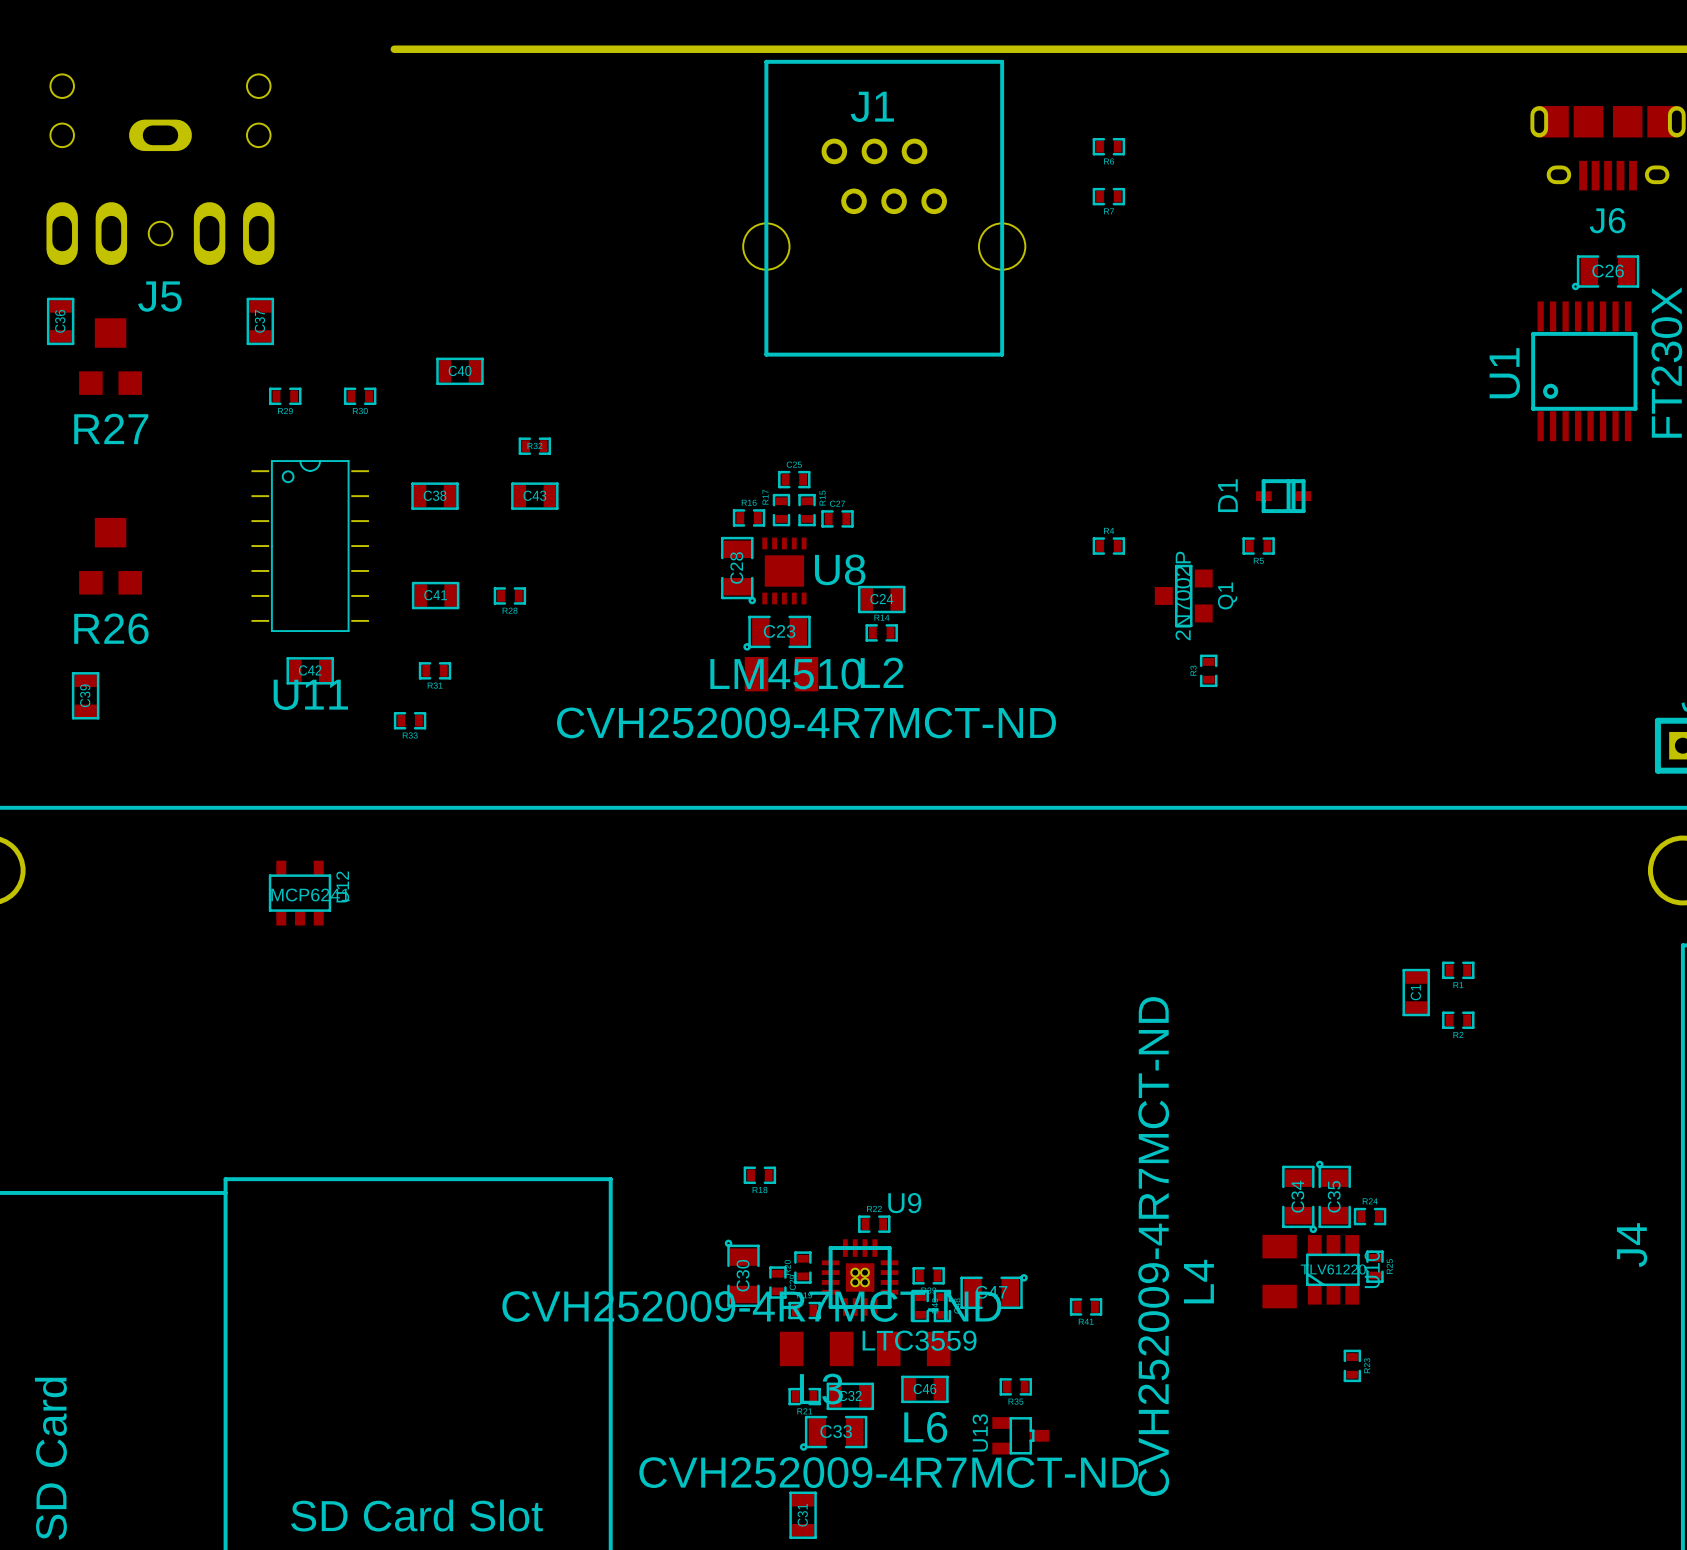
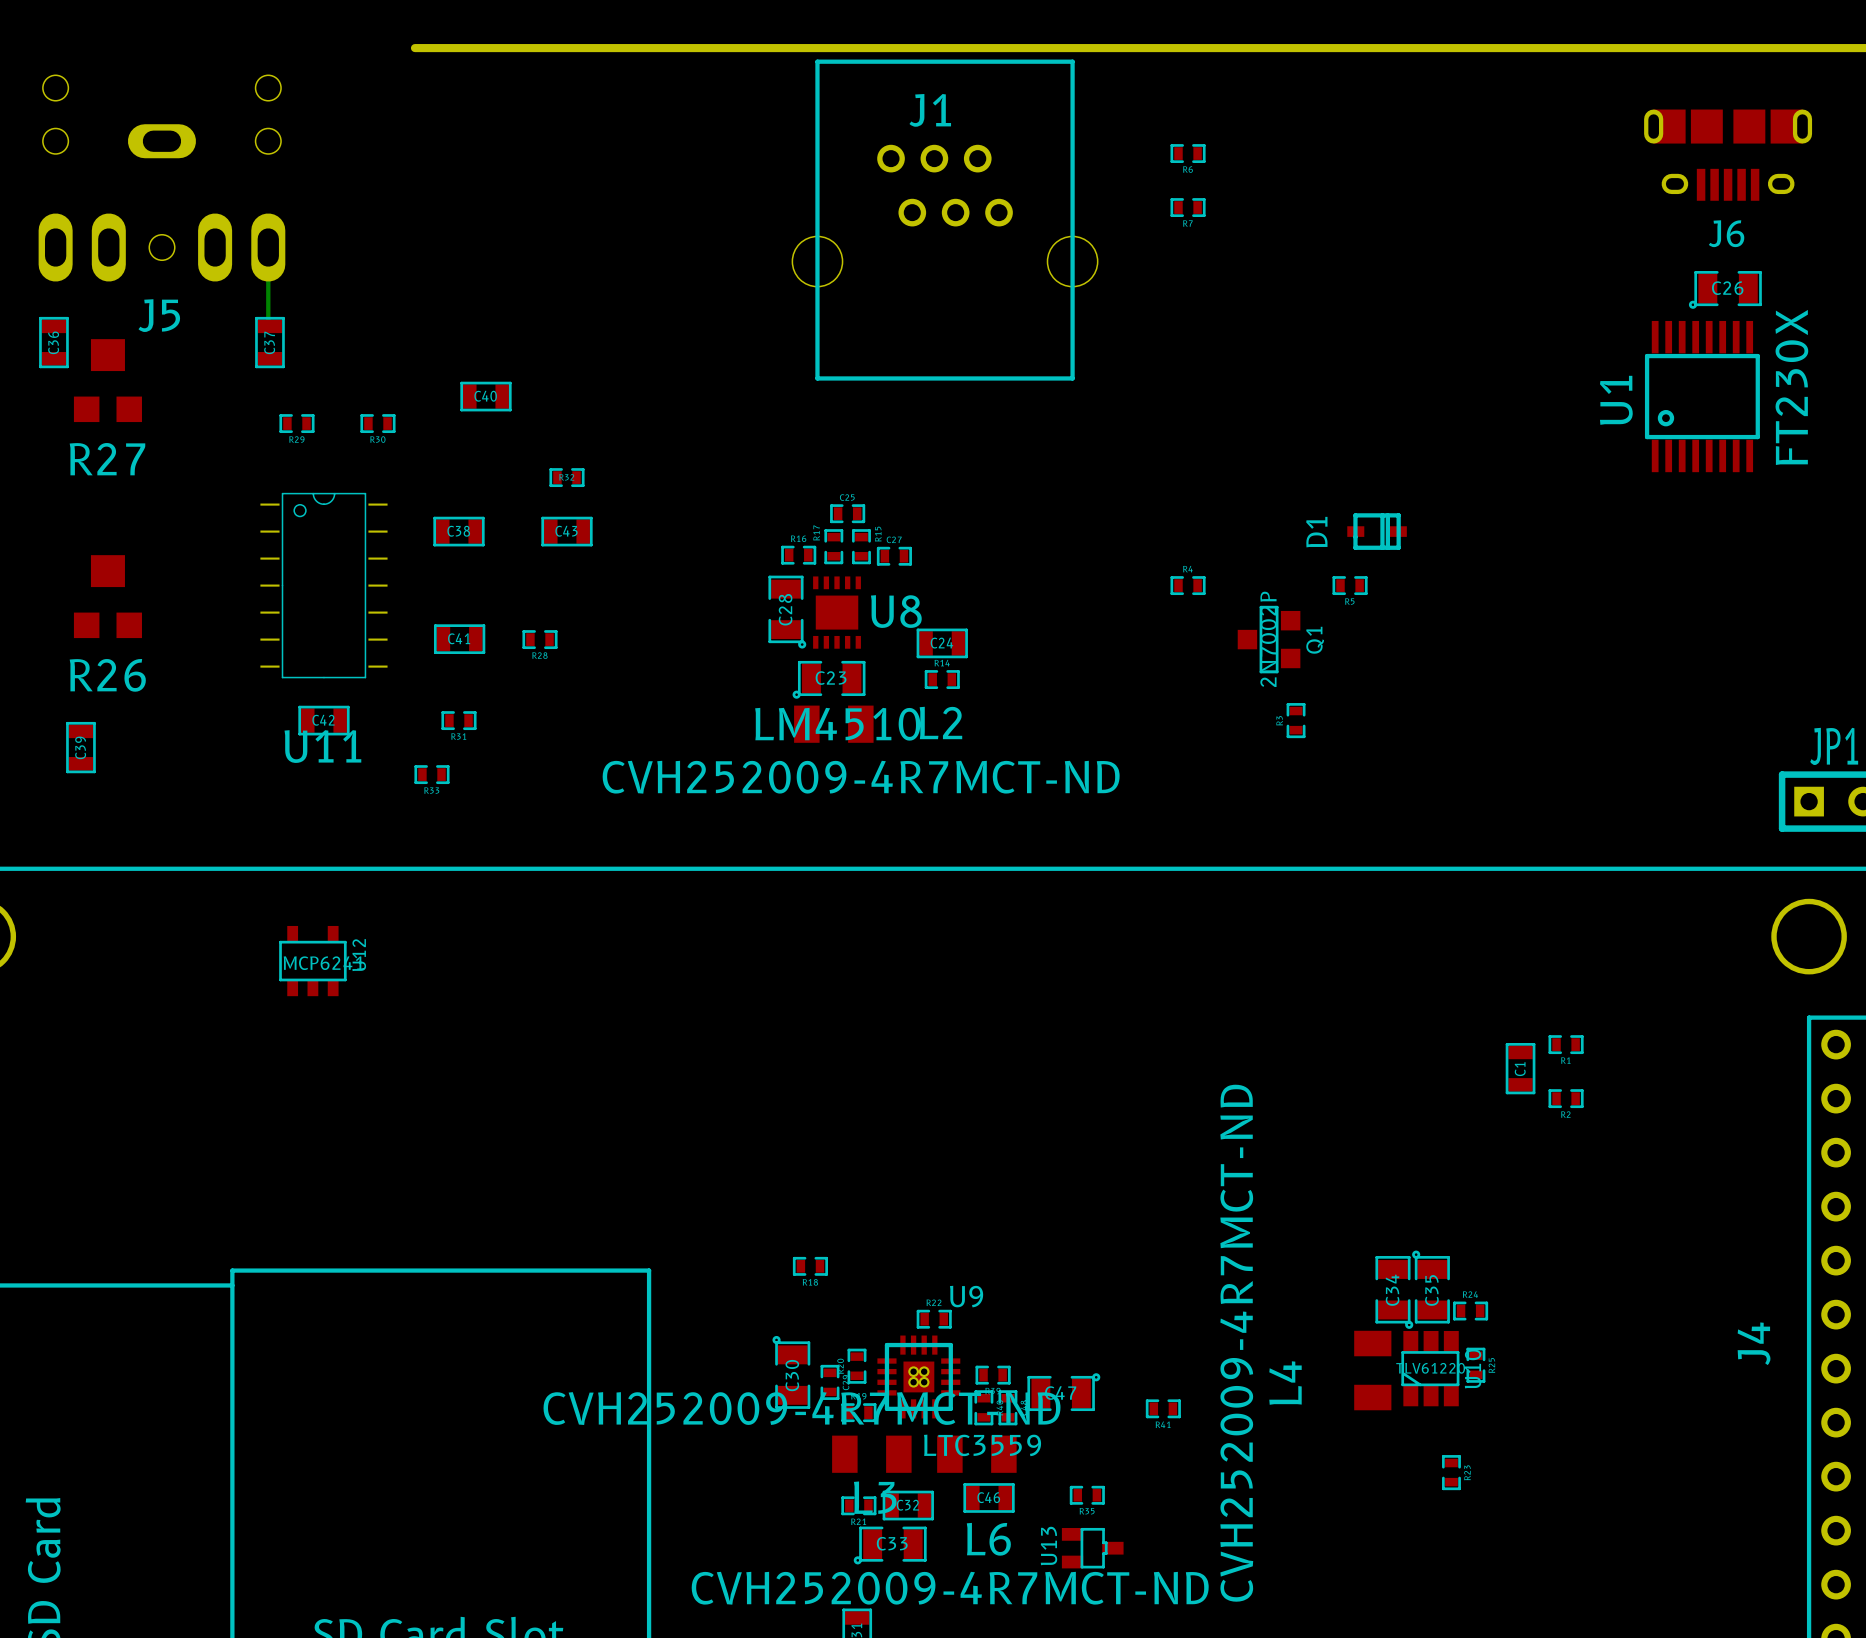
bottom track: none -> (268, 247) (268, 322)

